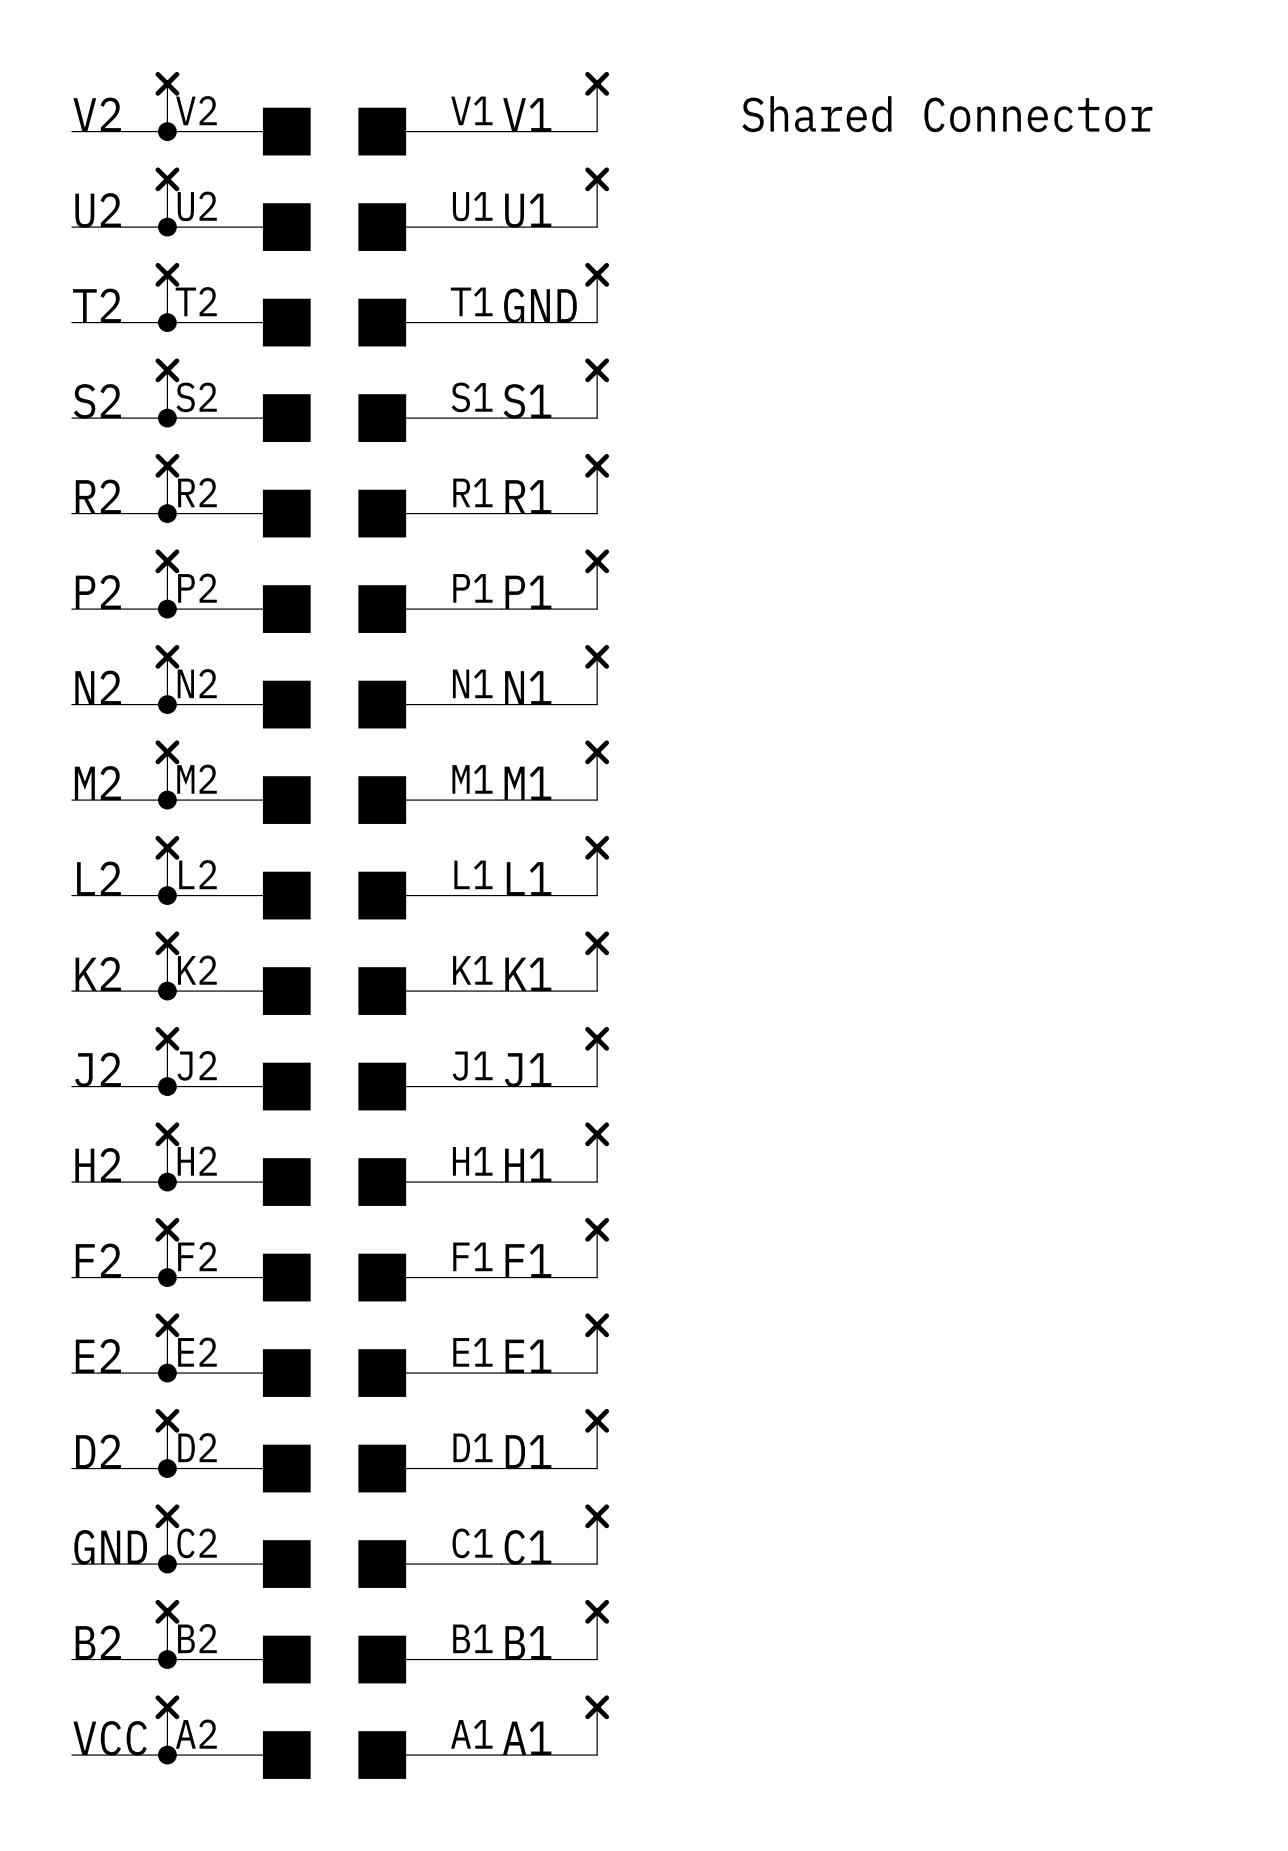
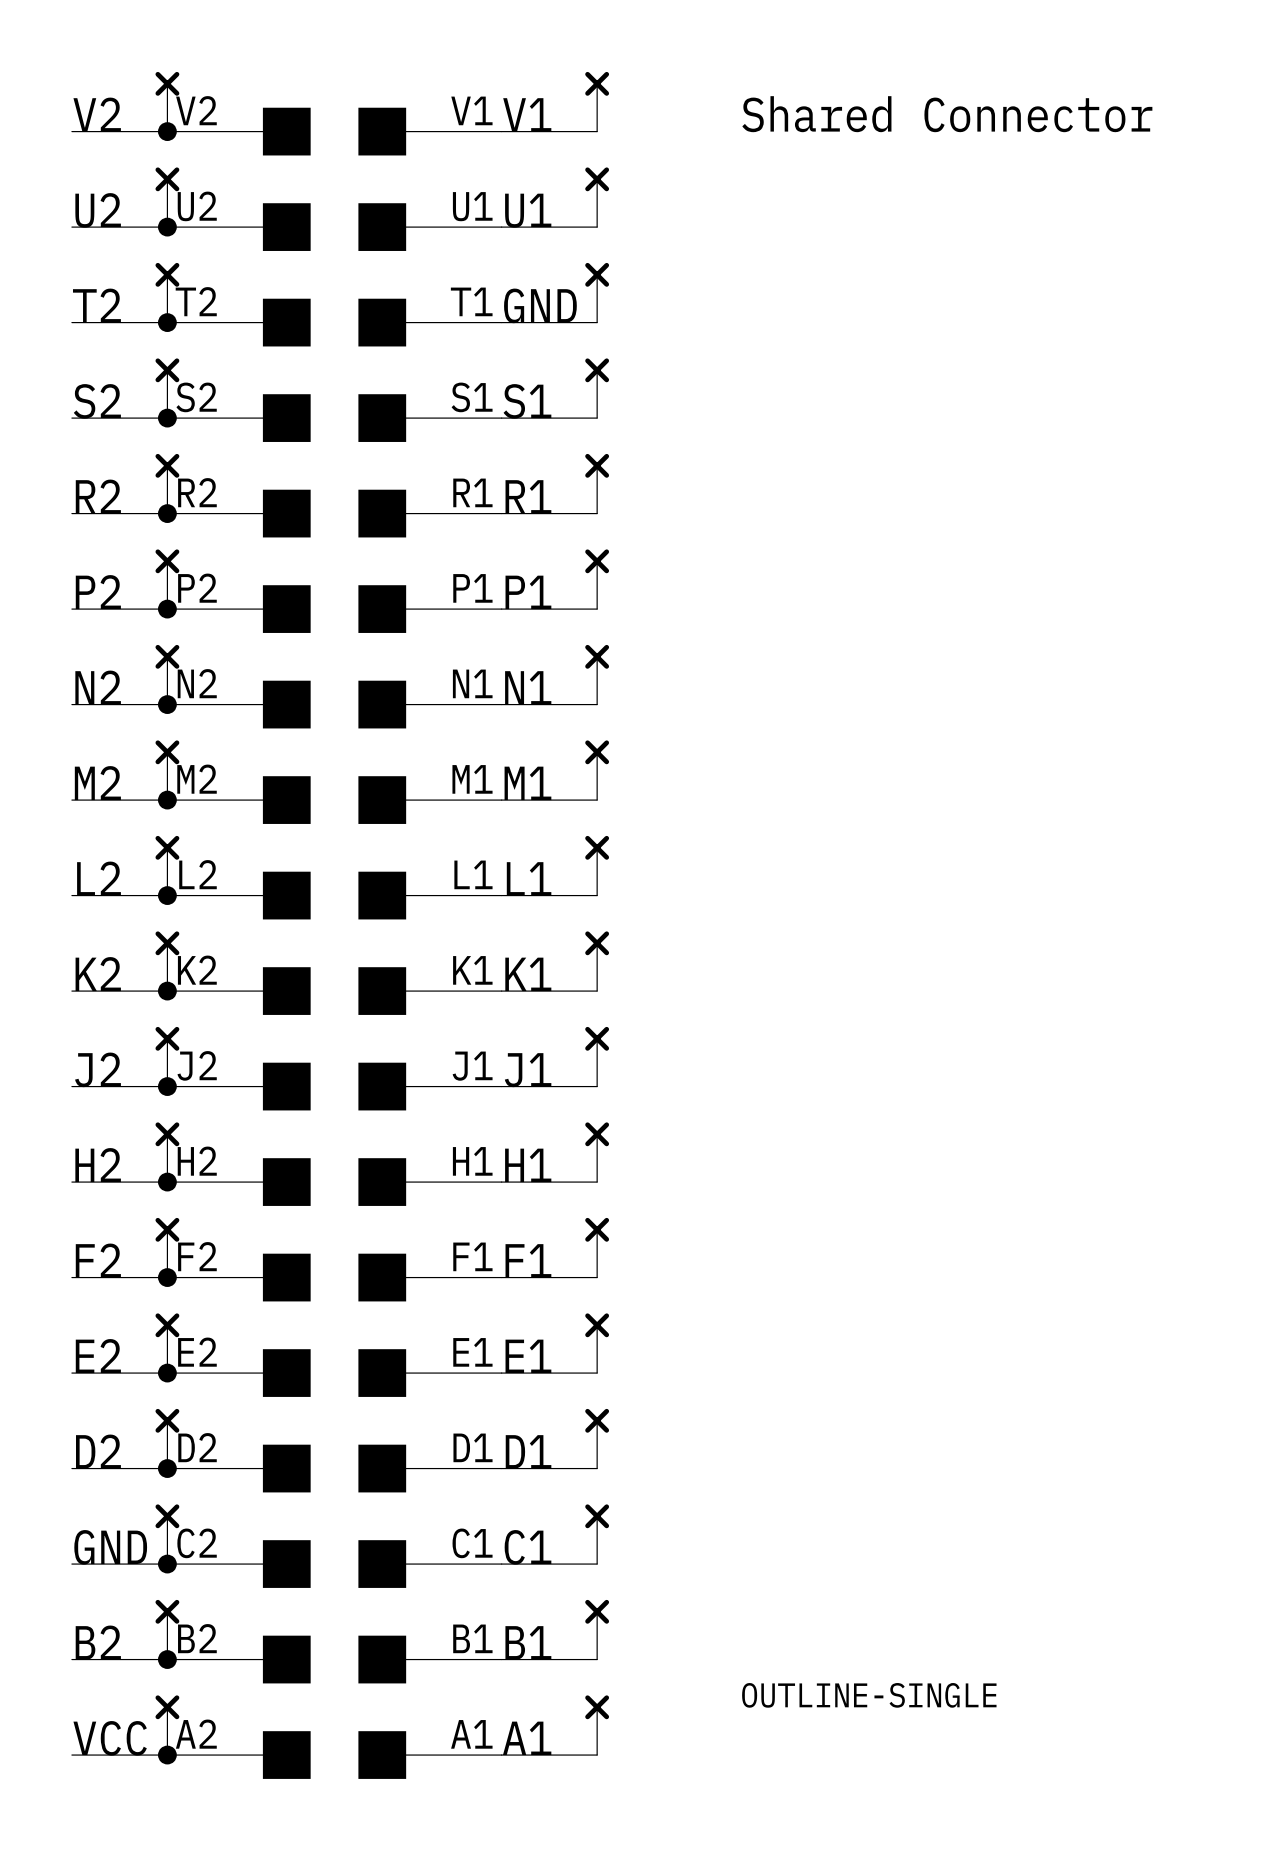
part: none -> OUTLINE-SINGLE (869, 1695)

